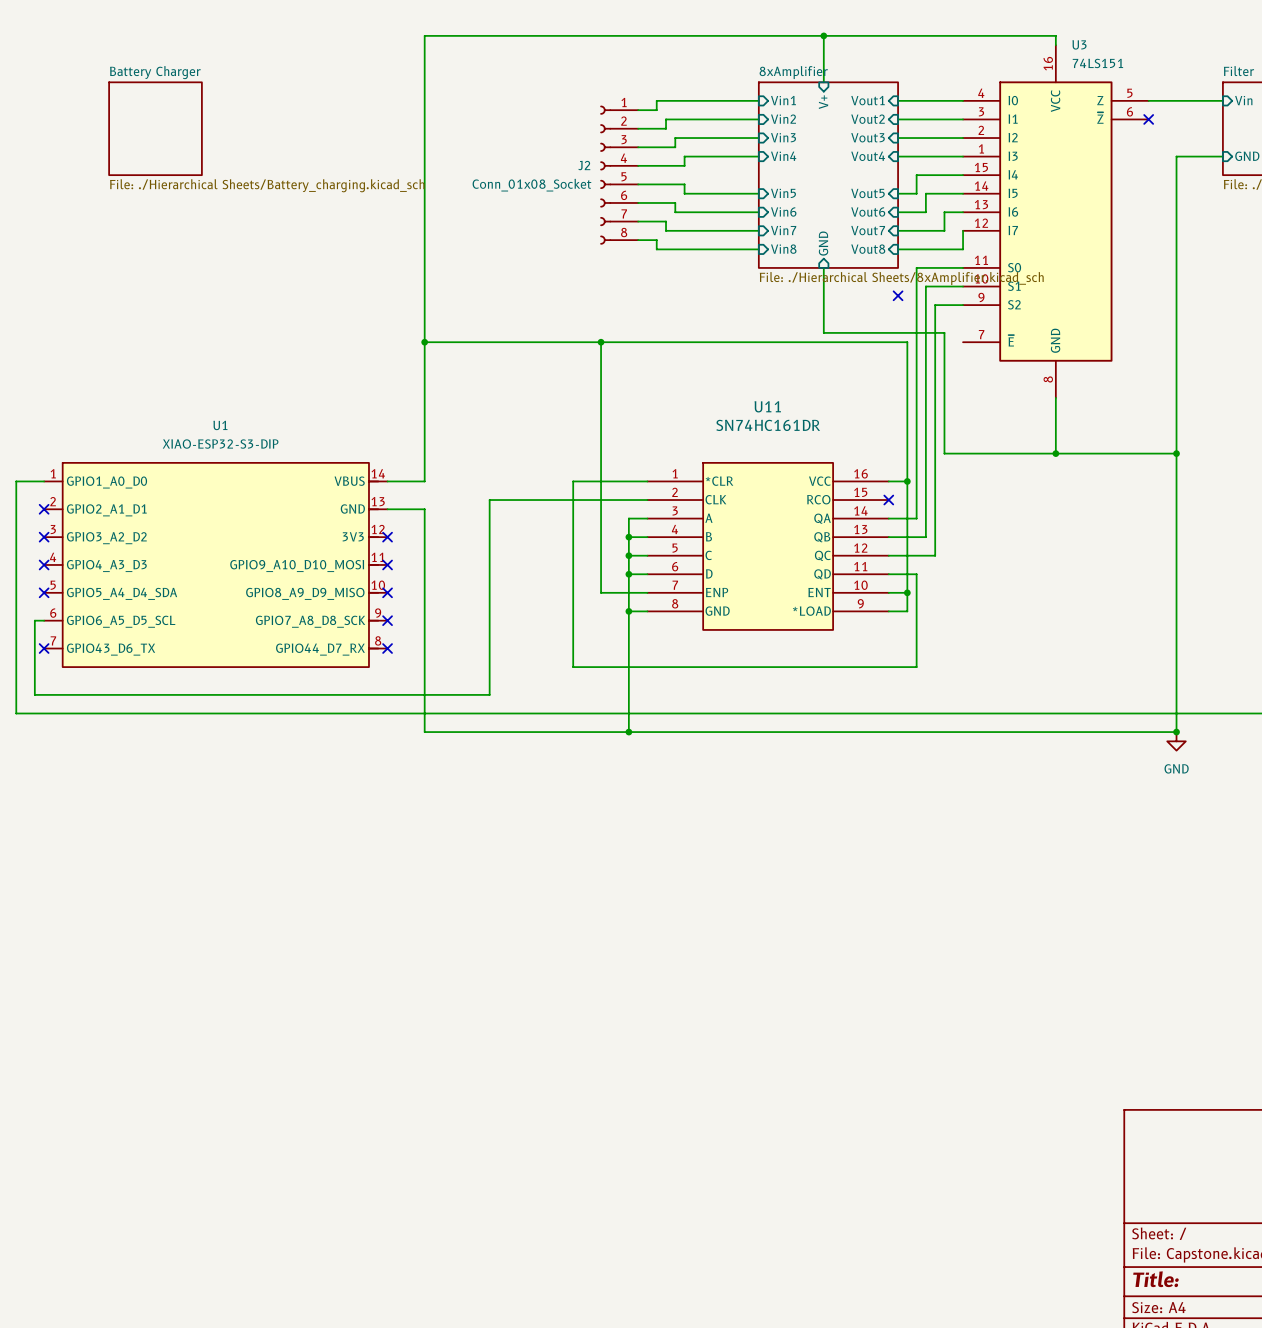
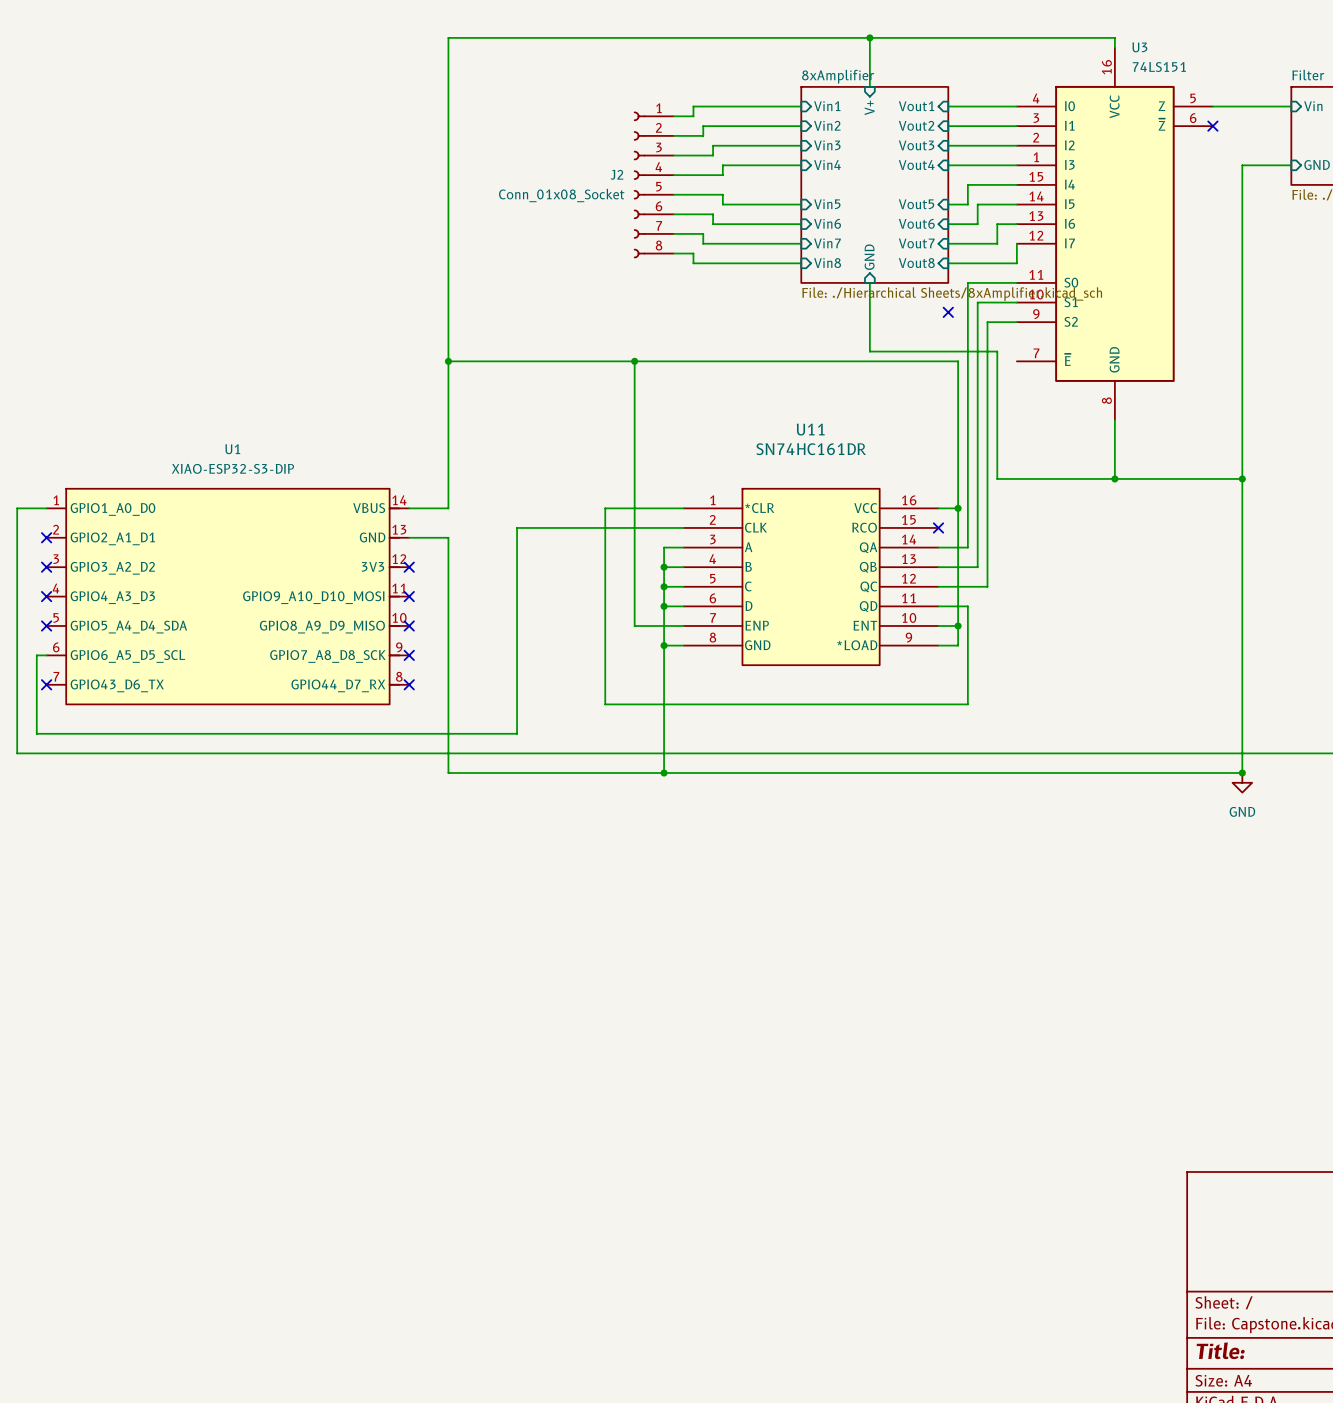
sheet Battery Charger: File: ./Hierarchical Sheets/Battery_charging.kicad_sch (155, 128) -> none

